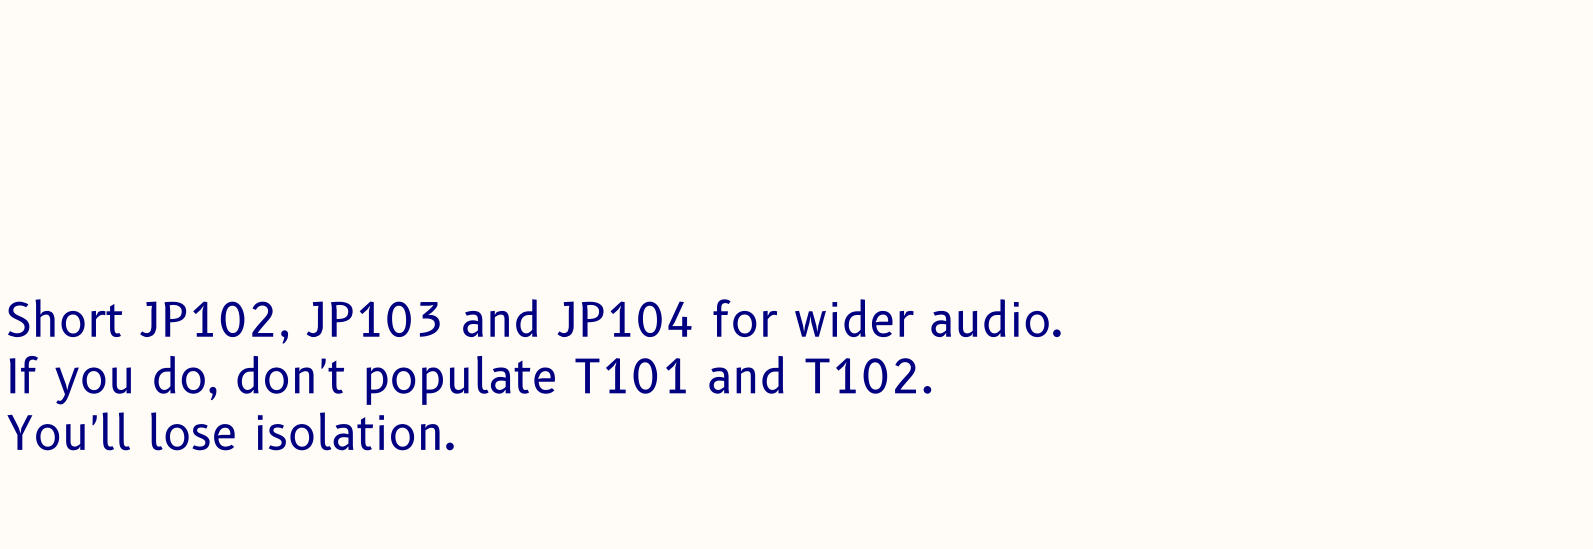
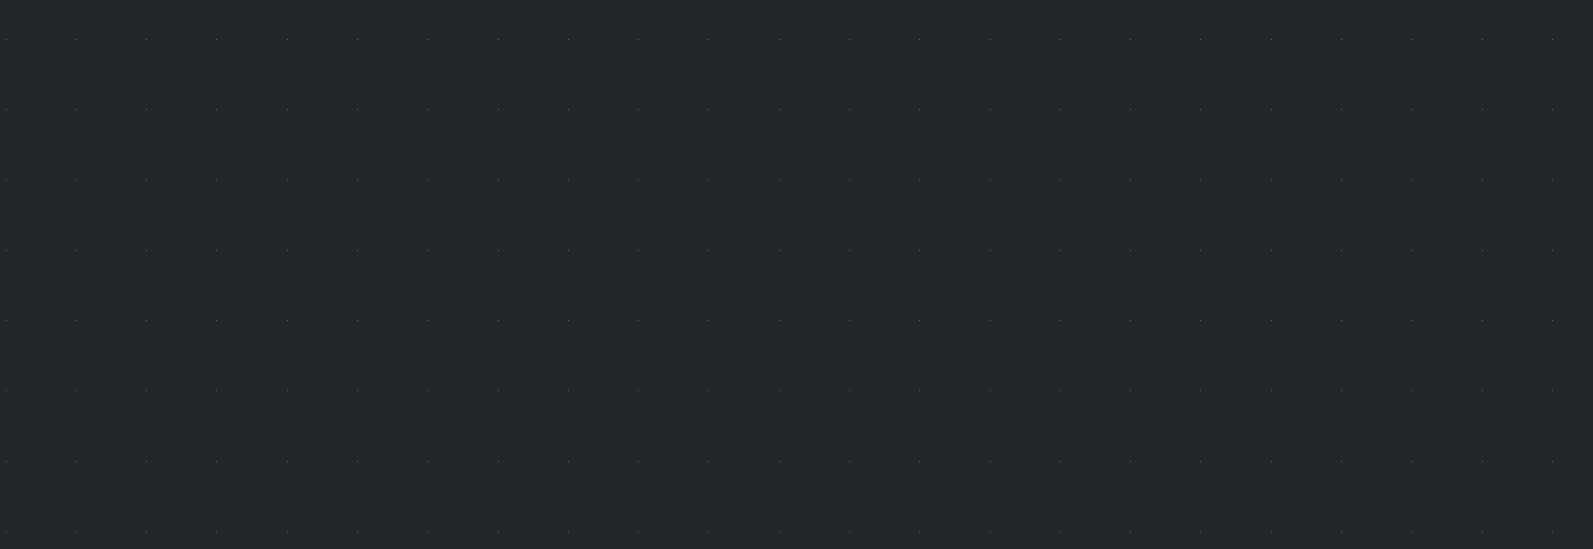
text: Short JP102, JP103 and JP104 for wider audio. (534, 321) -> none
text: If you do, don't populate T101 and T102. (470, 380) -> none
text: You'll lose isolation. (230, 431) -> none

